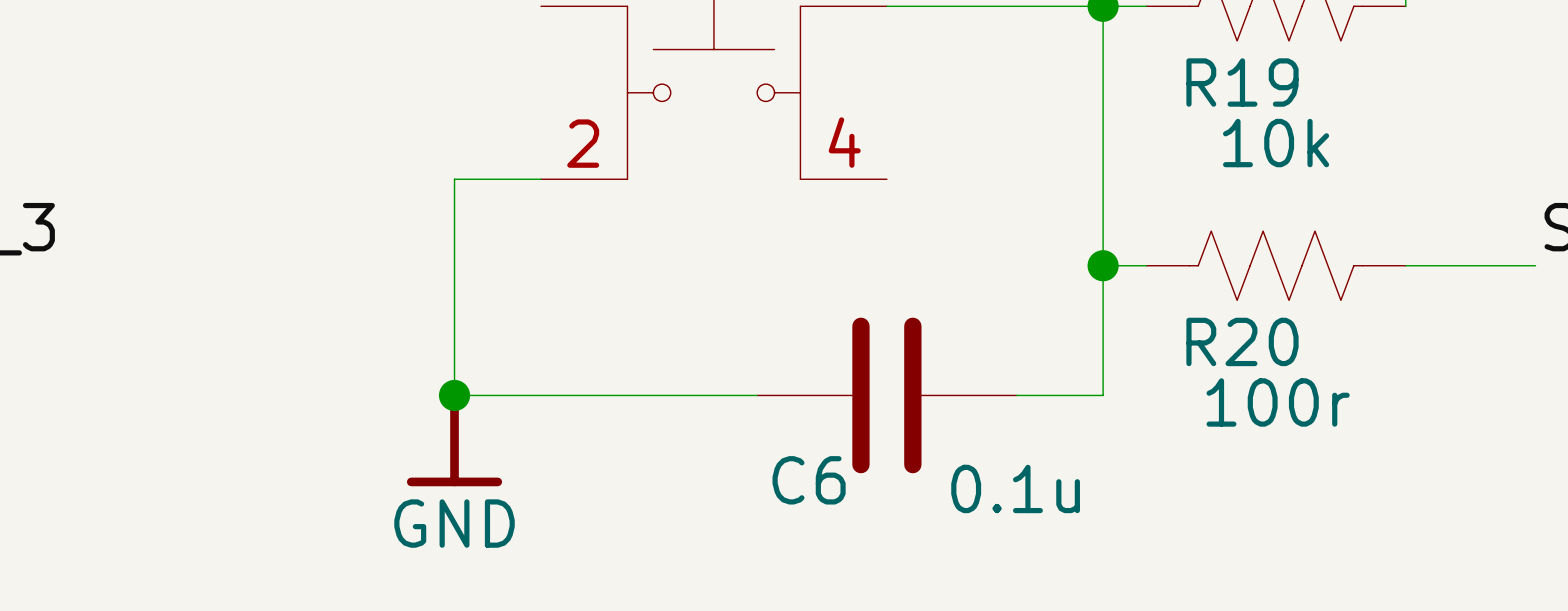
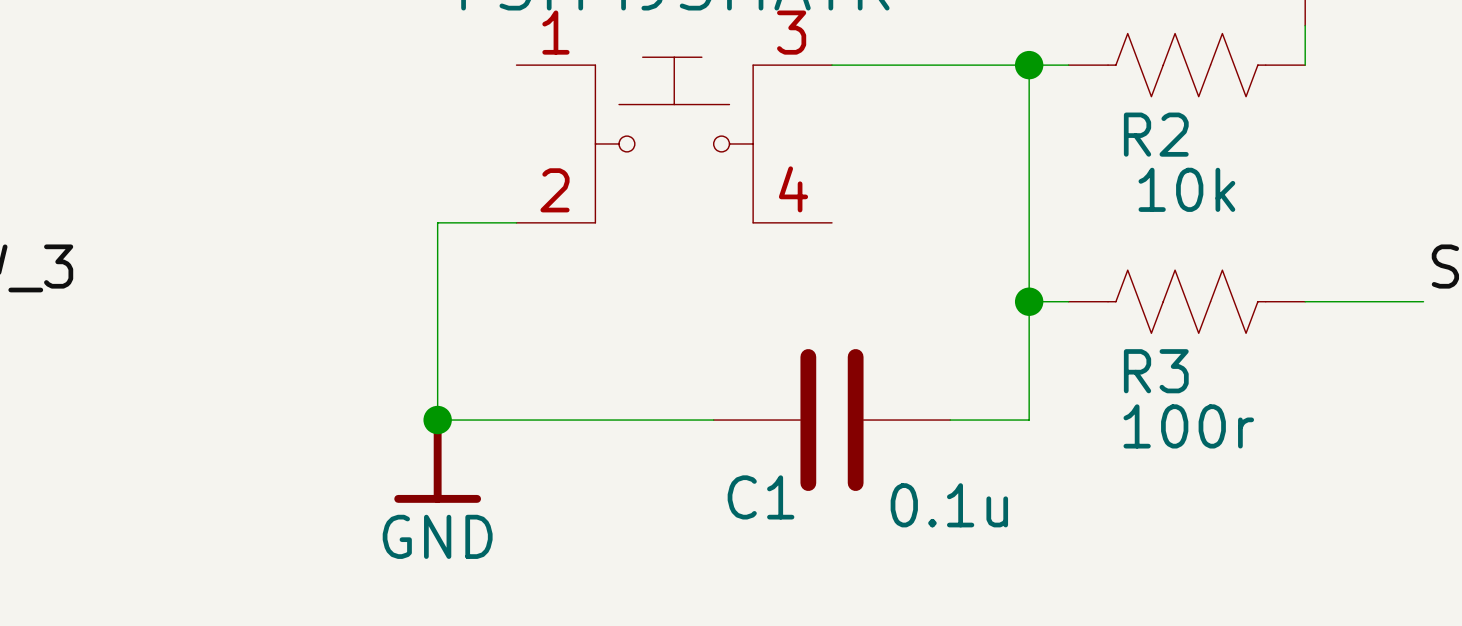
R19 name: R19 (1242, 82) -> R2 (1156, 134)
R20 name: R20 (1242, 341) -> R3 (1156, 371)
C6 name: C6 (809, 480) -> C1 (761, 497)

